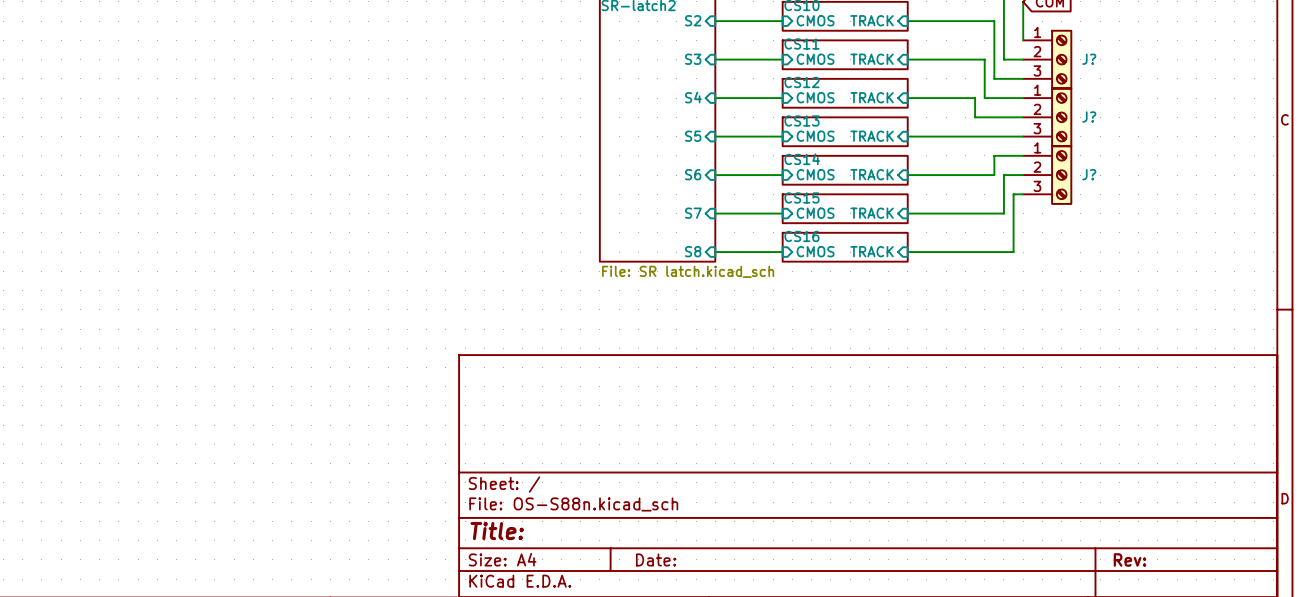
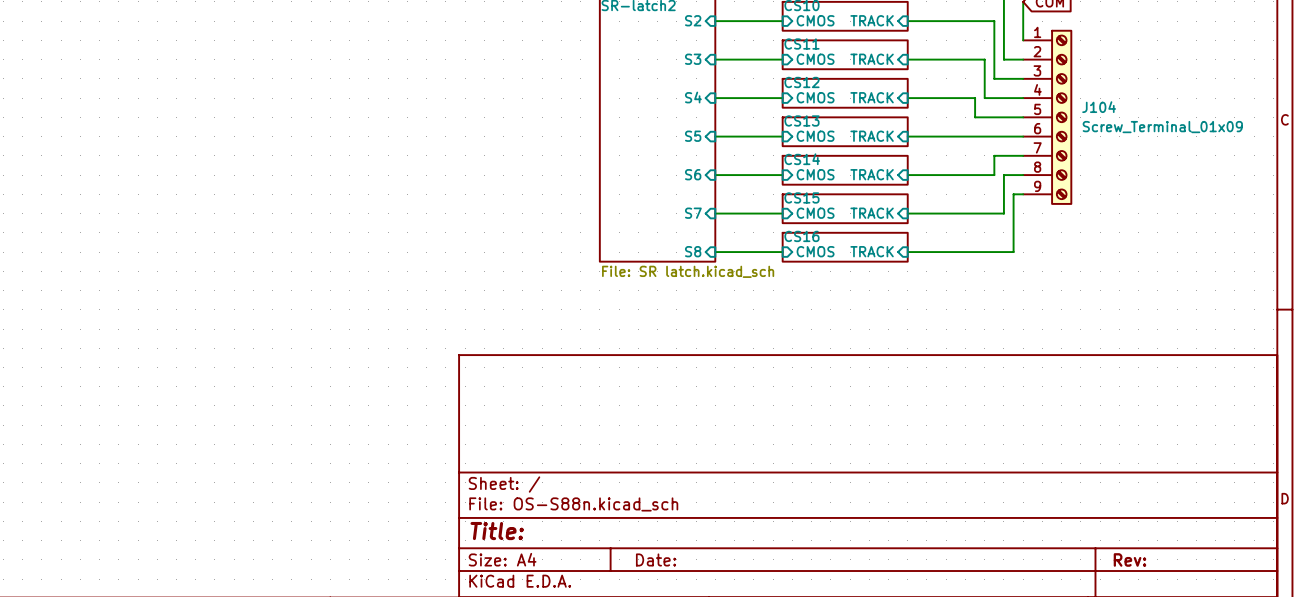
J?: (1047, 59) -> none
J?: (1047, 117) -> none
J104: none -> Screw_Terminal_01x09 (1047, 117)
J?: (1047, 175) -> none

